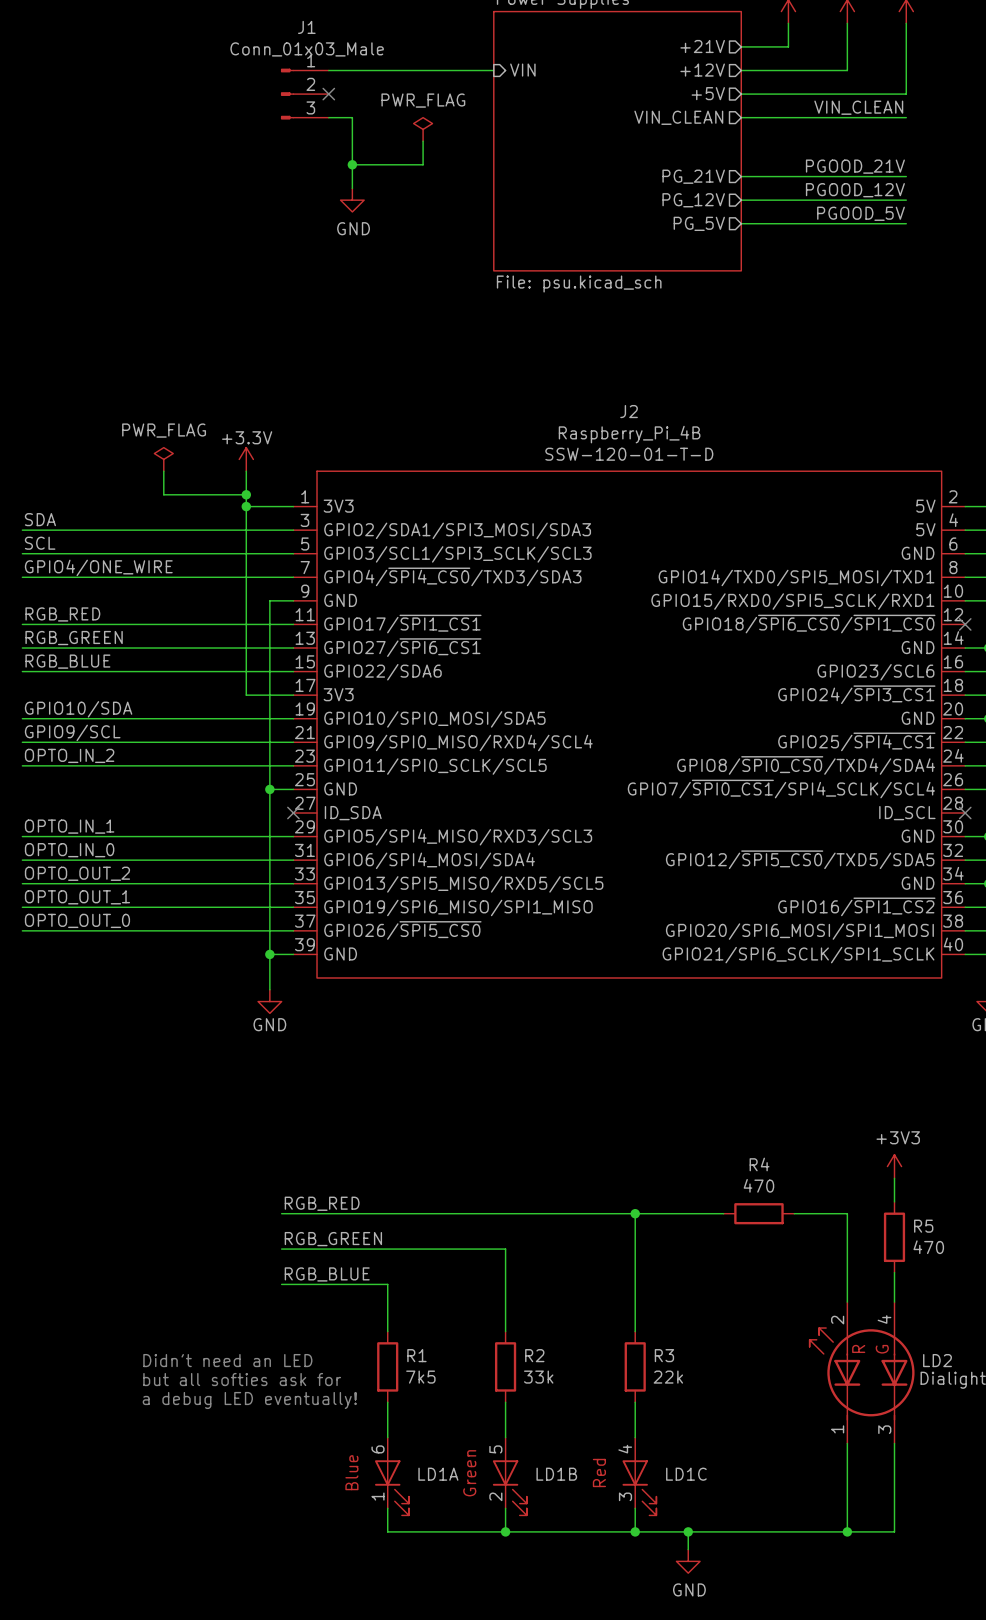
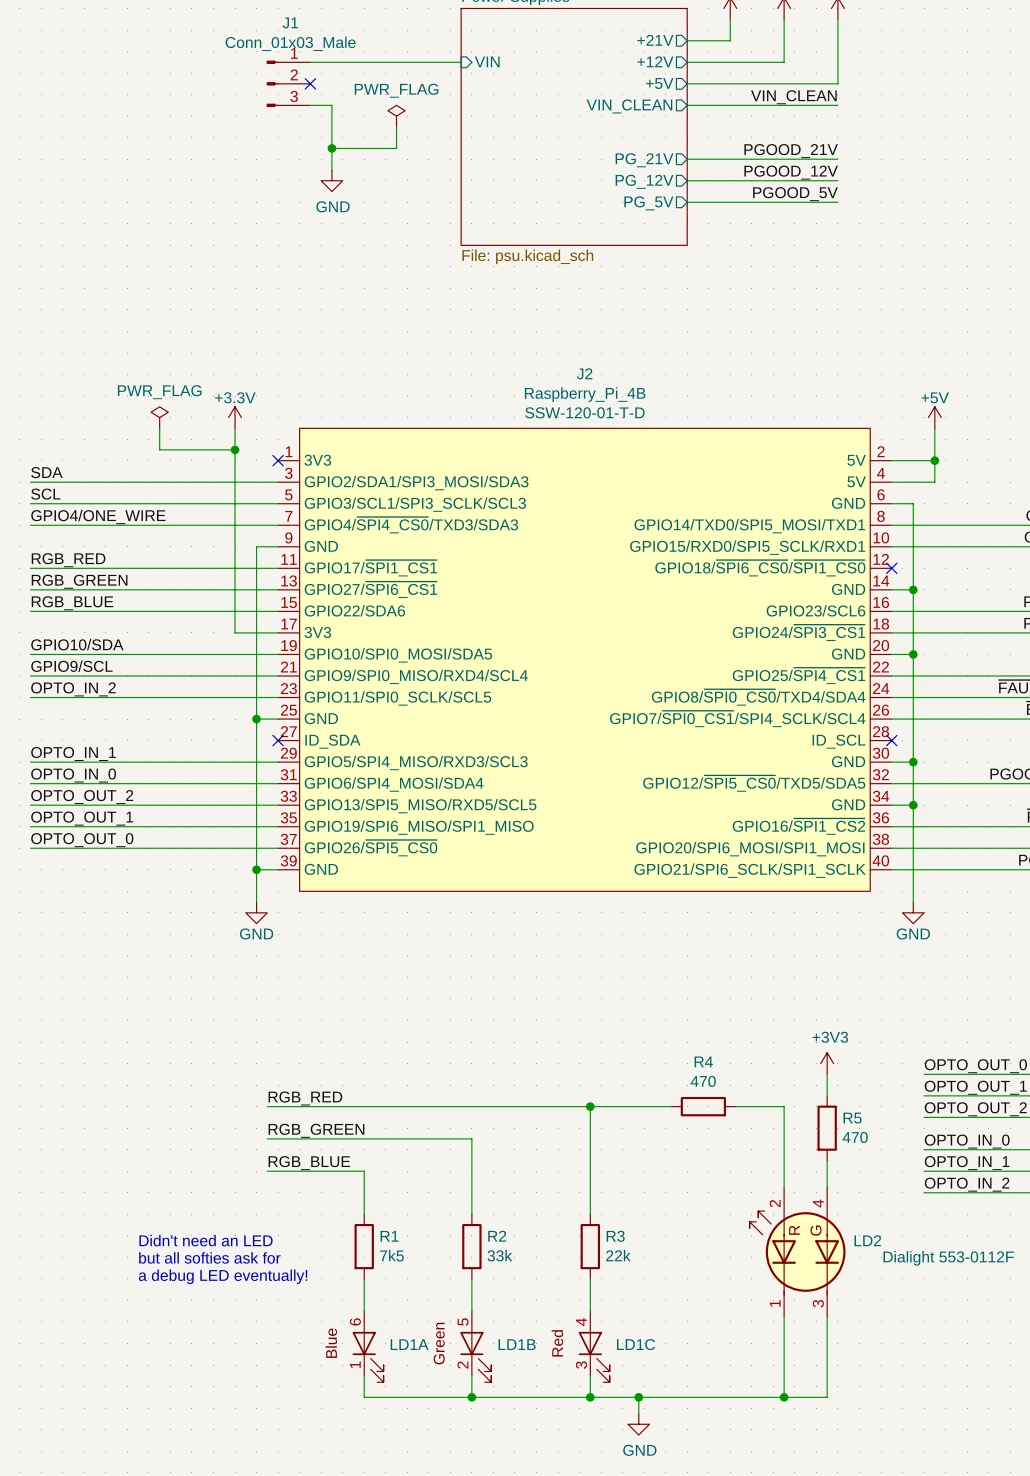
wire: (246, 506) (293, 506) -> none
junction: (246, 506) -> none
no-connect mark: none -> (278, 460)

